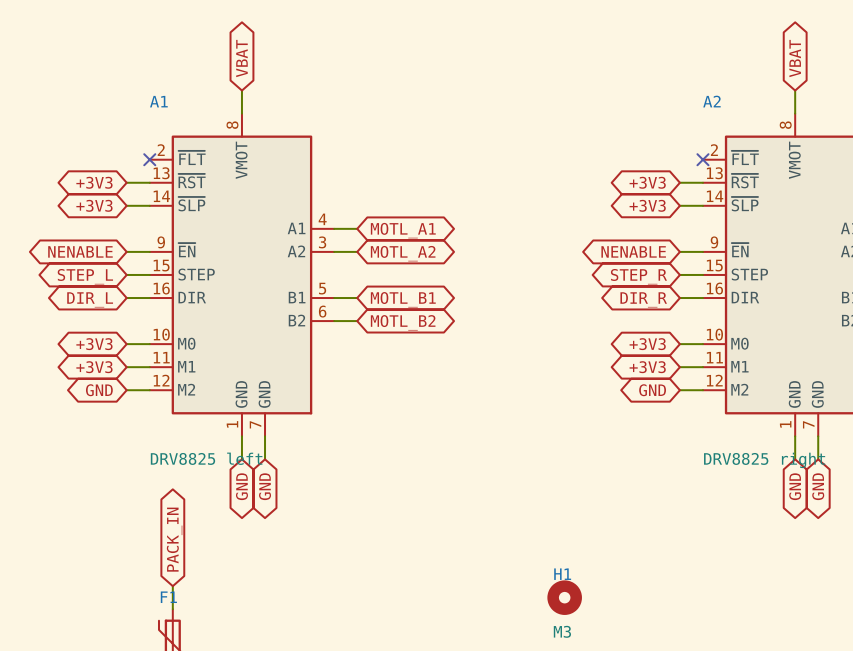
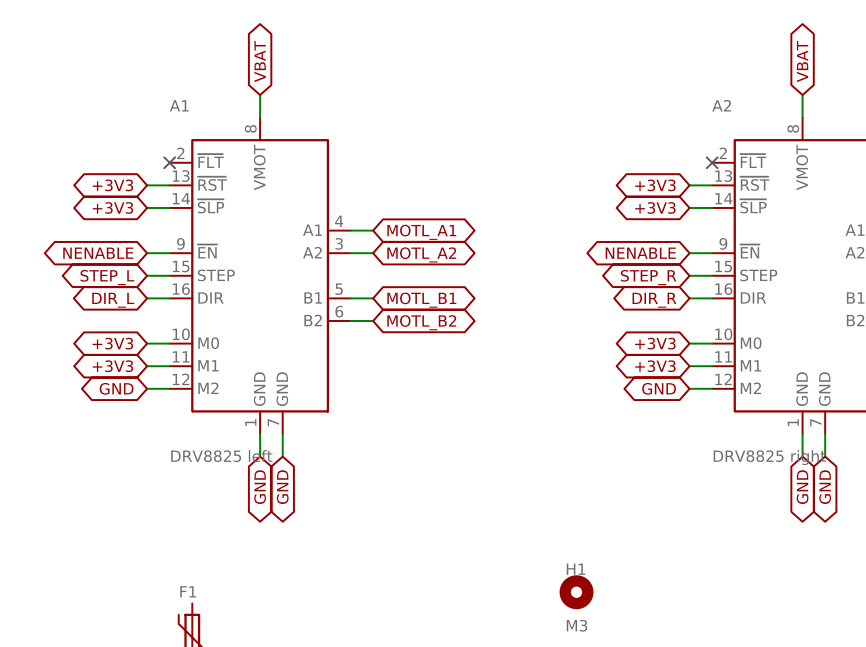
global label: PACK_IN (174, 539) -> none
wire: (172, 586) (172, 609) -> none

